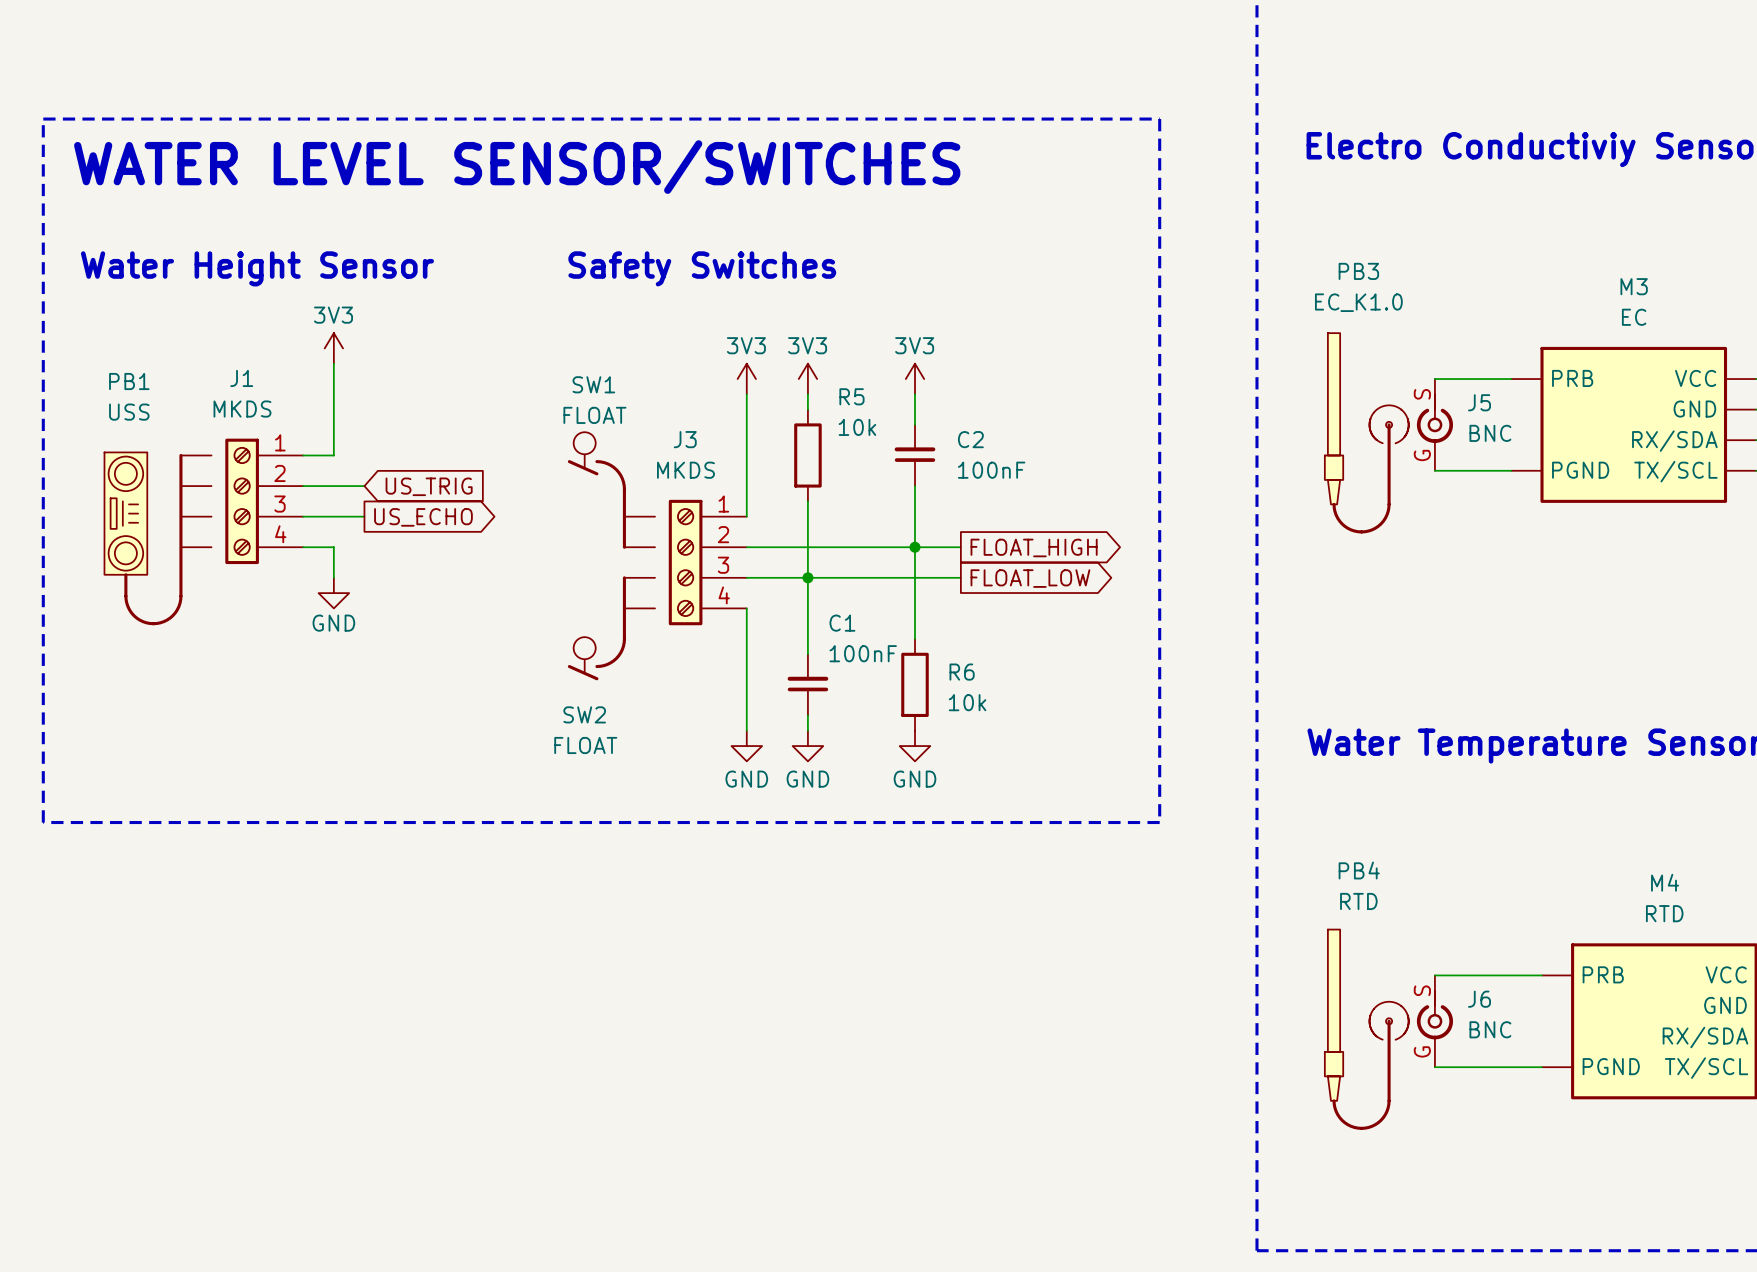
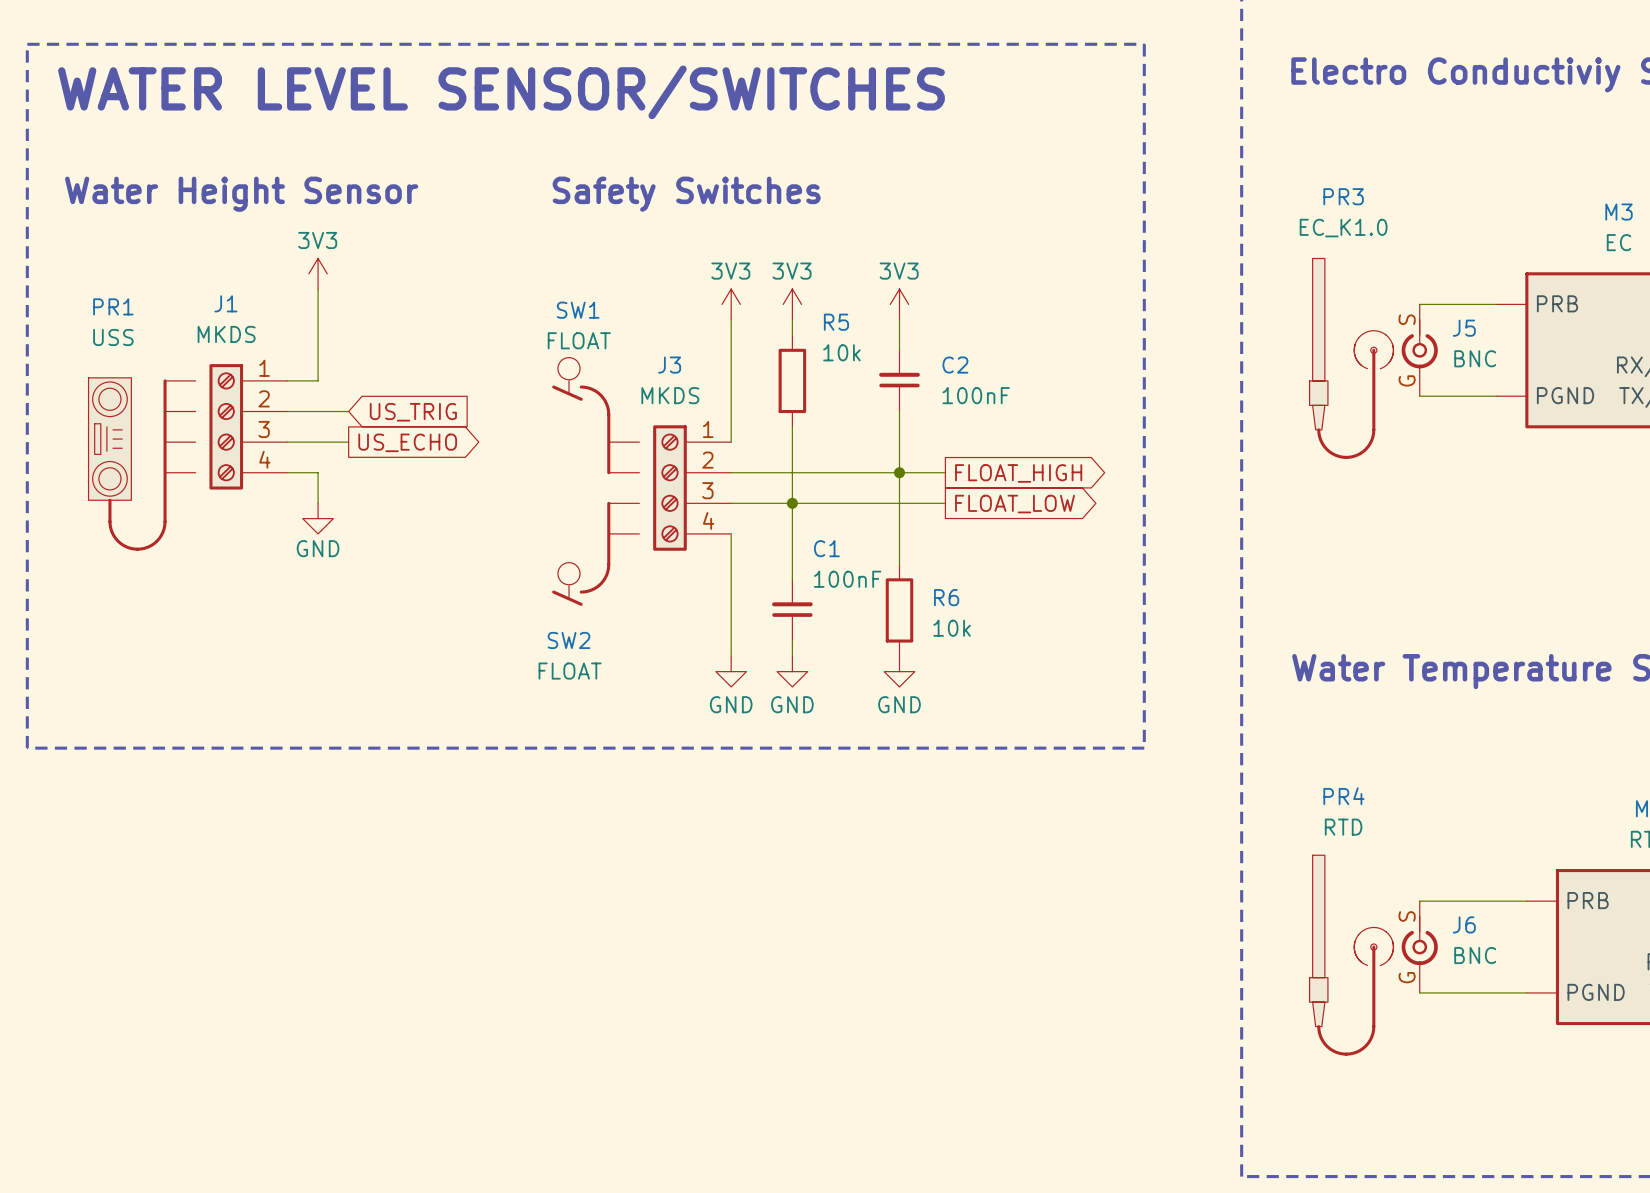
PB3 name: PB3 (1358, 271) -> PR3 (1343, 196)
PB1 name: PB1 (129, 381) -> PR1 (113, 306)
PB4 name: PB4 (1359, 870) -> PR4 (1343, 796)

